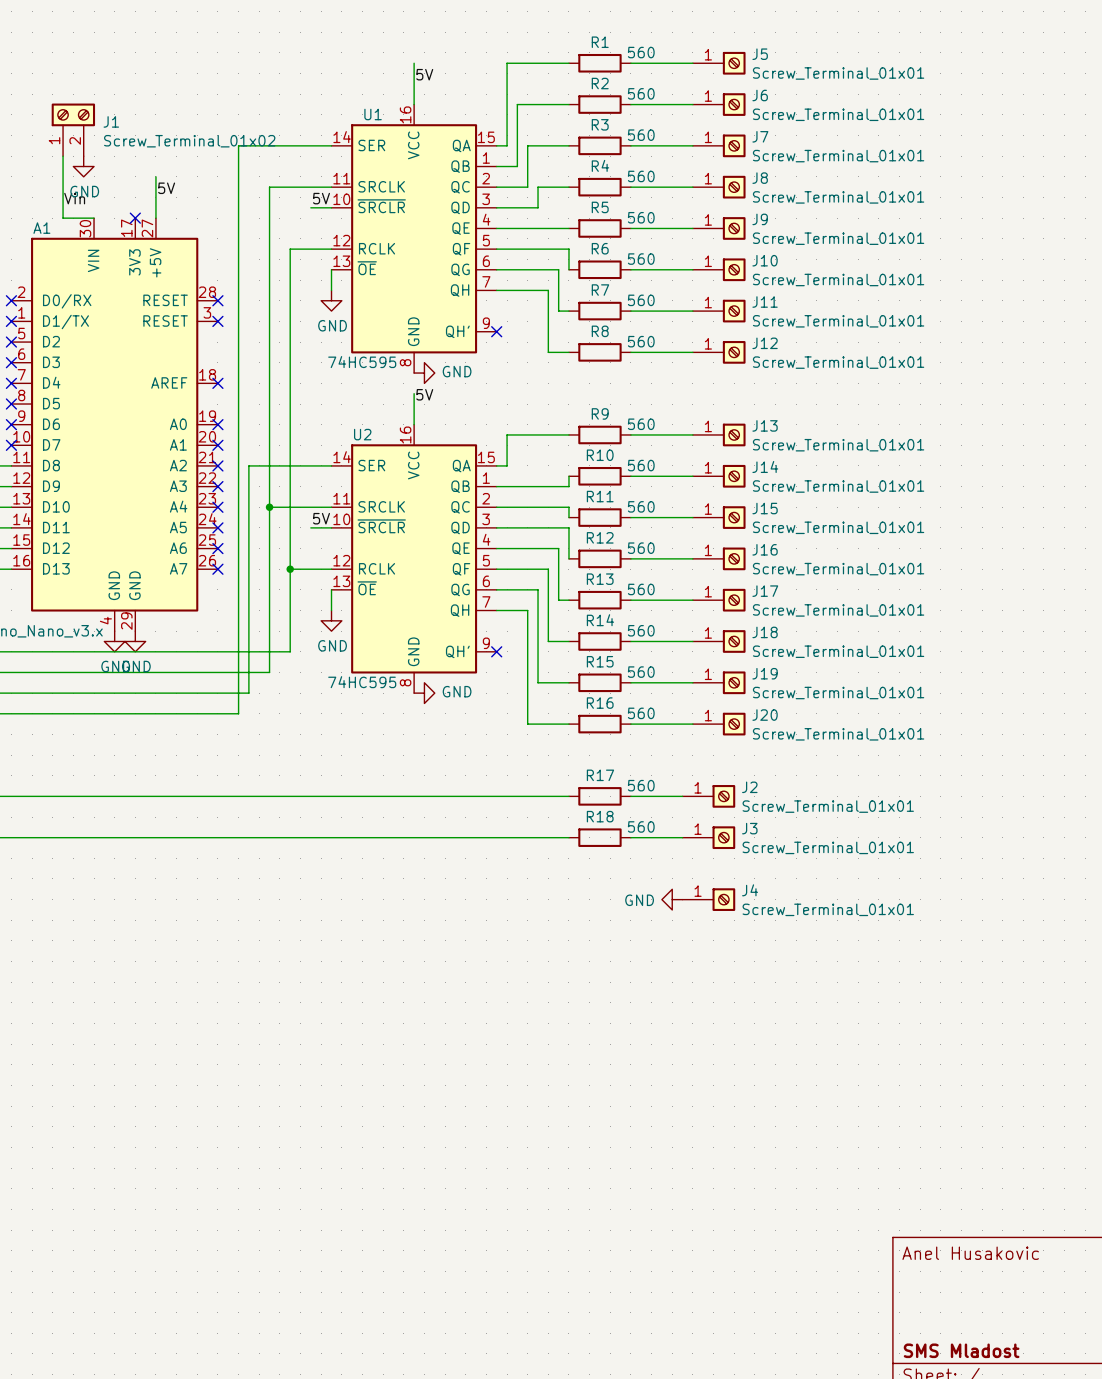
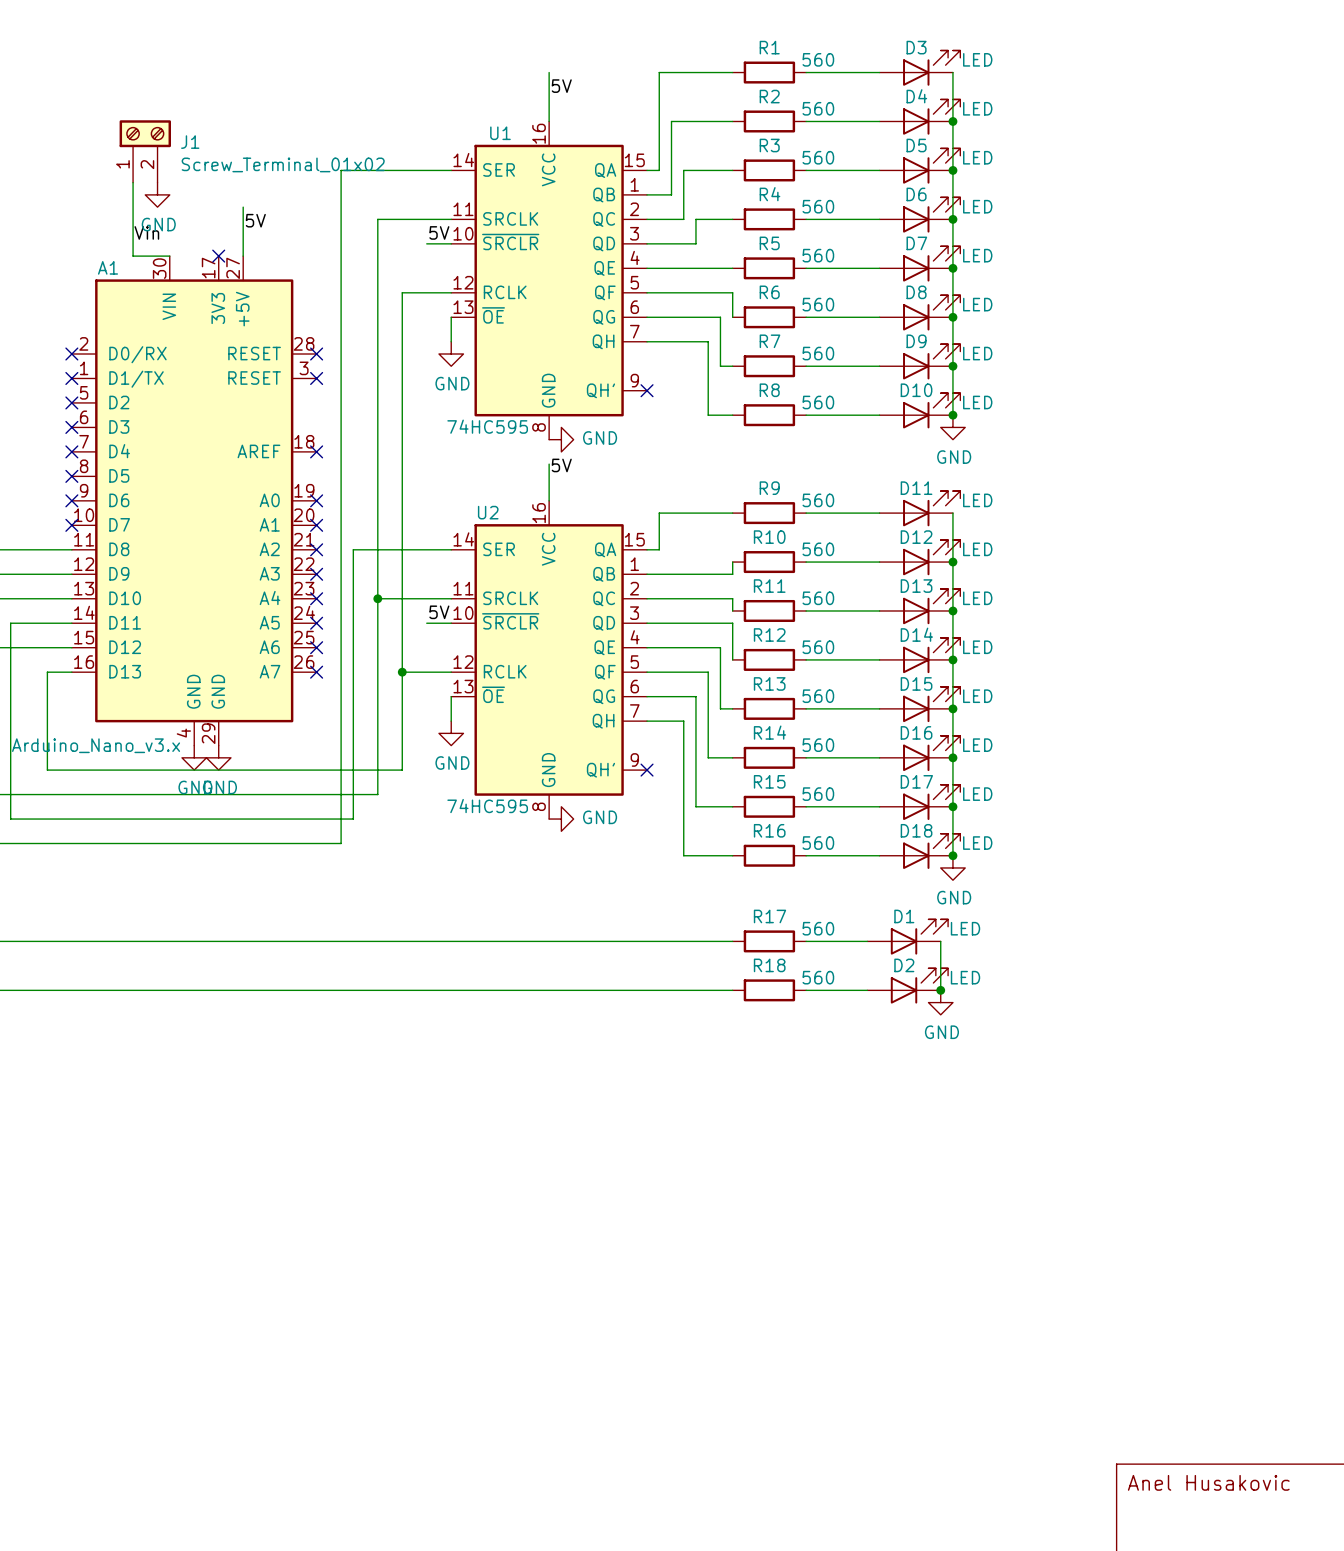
D3: none -> LED (919, 68)
J5: Screw_Terminal_01x01 (719, 63) -> none
wire: none -> (952, 72) (952, 415)
D4: none -> LED (919, 117)
J6: Screw_Terminal_01x01 (719, 104) -> none
junction: none -> (952, 121)
D5: none -> LED (919, 166)
J7: Screw_Terminal_01x01 (719, 145) -> none
junction: none -> (952, 170)
D6: none -> LED (919, 214)
J8: Screw_Terminal_01x01 (719, 187) -> none
junction: none -> (952, 219)
D7: none -> LED (919, 263)
J9: Screw_Terminal_01x01 (719, 228) -> none
junction: none -> (952, 268)
D8: none -> LED (919, 312)
J10: Screw_Terminal_01x01 (719, 269) -> none
junction: none -> (952, 317)
D9: none -> LED (919, 361)
J11: Screw_Terminal_01x01 (719, 311) -> none
junction: none -> (952, 366)
D10: none -> LED (919, 410)
J12: Screw_Terminal_01x01 (719, 352) -> none
junction: none -> (952, 415)
power symbol: none -> GND (952, 427)
D11: none -> LED (919, 508)
J13: Screw_Terminal_01x01 (719, 434) -> none
wire: none -> (952, 513) (952, 855)
D12: none -> LED (919, 557)
J14: Screw_Terminal_01x01 (719, 476) -> none
junction: none -> (952, 562)
D13: none -> LED (919, 606)
J15: Screw_Terminal_01x01 (719, 517) -> none
junction: none -> (952, 610)
D14: none -> LED (919, 655)
J16: Screw_Terminal_01x01 (719, 558) -> none
junction: none -> (952, 659)
D15: none -> LED (919, 704)
J17: Screw_Terminal_01x01 (719, 600) -> none
junction: none -> (952, 708)
D16: none -> LED (919, 753)
J18: Screw_Terminal_01x01 (719, 641) -> none
junction: none -> (952, 757)
D17: none -> LED (919, 802)
J19: Screw_Terminal_01x01 (719, 682) -> none
junction: none -> (952, 806)
D18: none -> LED (919, 851)
J20: Screw_Terminal_01x01 (719, 724) -> none
junction: none -> (952, 855)
power symbol: none -> GND (952, 867)
D1: none -> LED (907, 937)
J2: Screw_Terminal_01x01 (708, 796) -> none
wire: none -> (940, 941) (940, 990)
D2: none -> LED (907, 985)
J3: Screw_Terminal_01x01 (708, 837) -> none
junction: none -> (940, 990)
power symbol rotation: 0° (672, 899) -> 90° counterclockwise (940, 1002)
power symbol position: GND (672, 899) -> GND (940, 1002)
J4: Screw_Terminal_01x01 (708, 899) -> none

